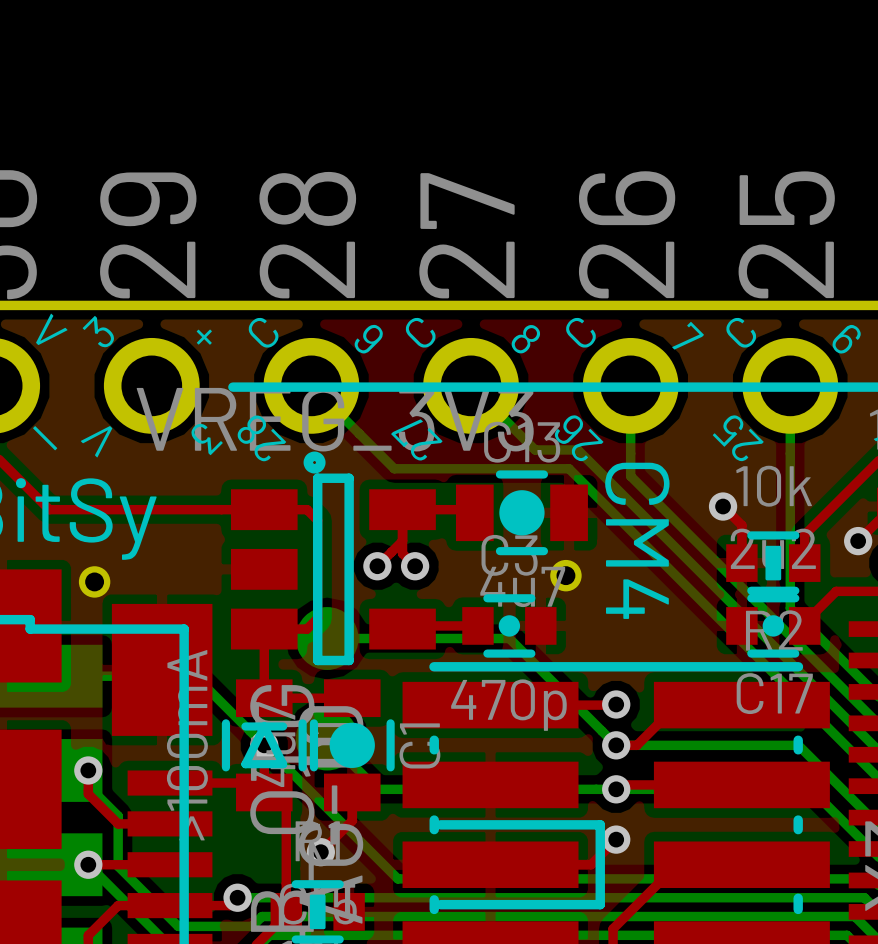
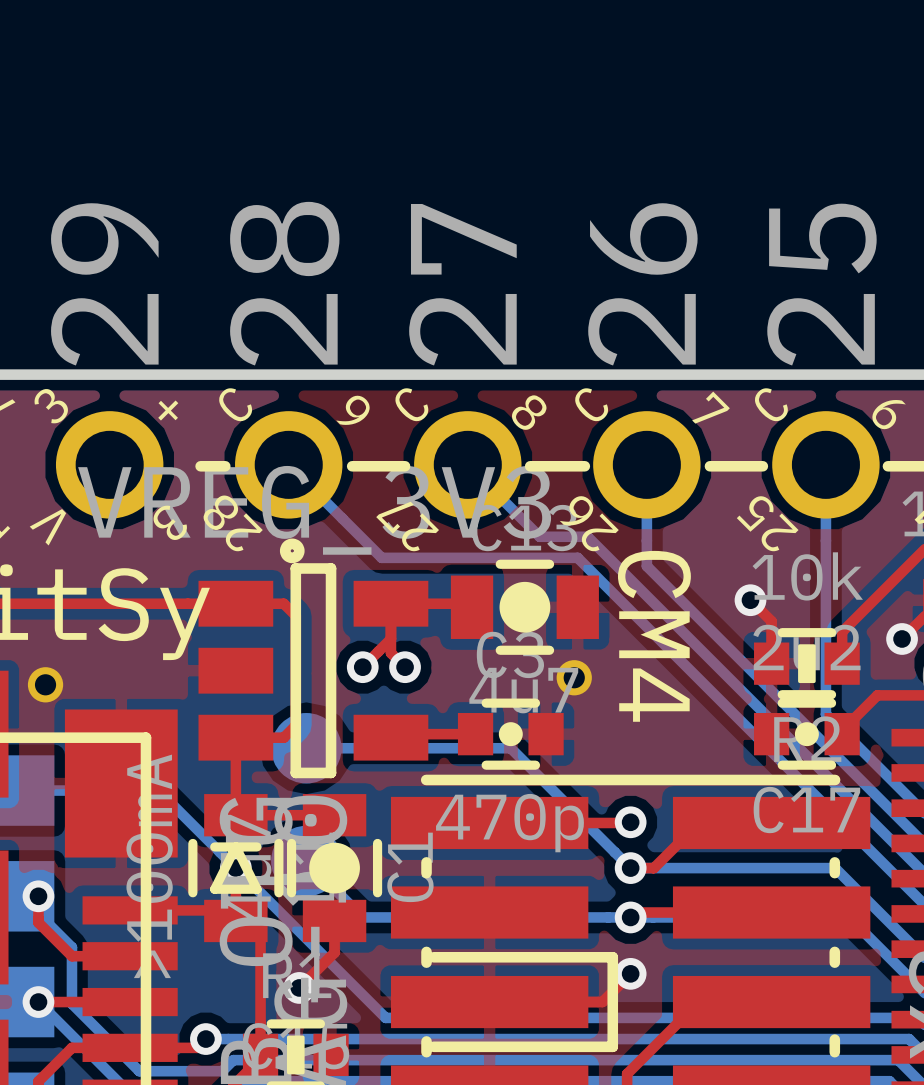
line: (254, 387) (367, 387) -> none
line: (415, 387) (526, 387) -> none
line: (575, 387) (686, 387) -> none
line: (734, 387) (845, 387) -> none

